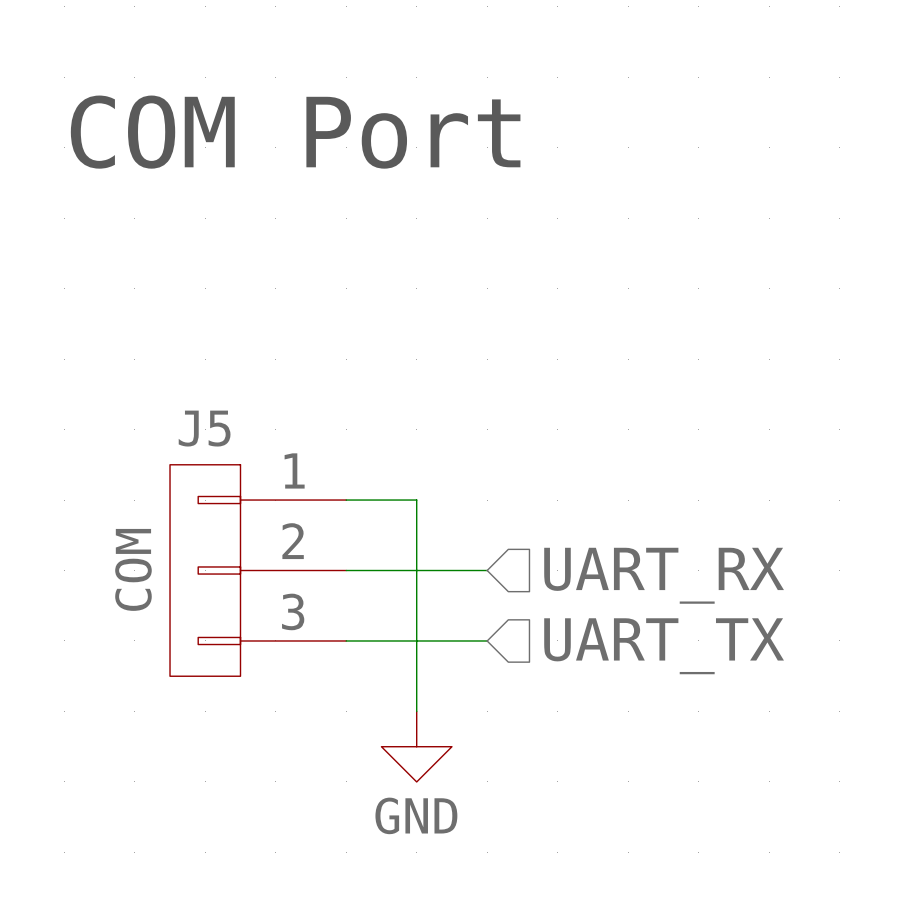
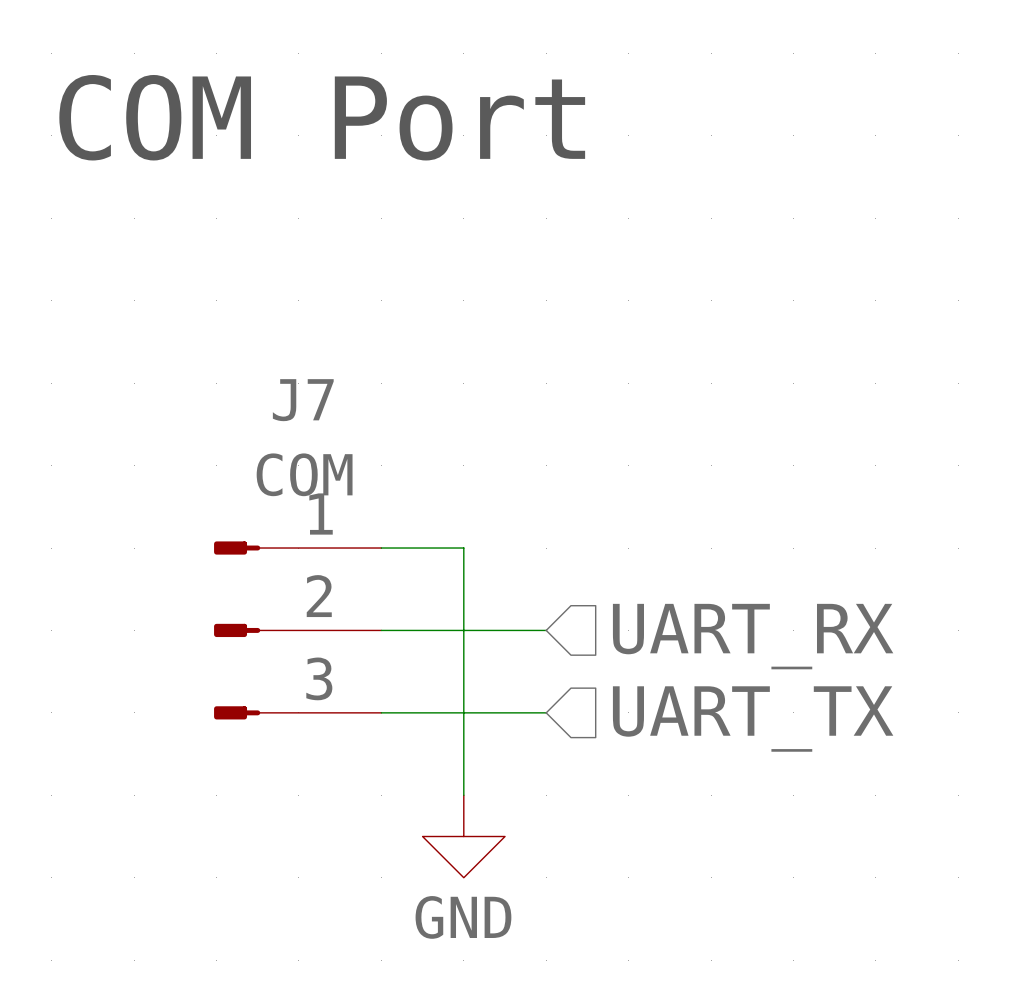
J5: COM (258, 570) -> none
J7: none -> COM (297, 630)

